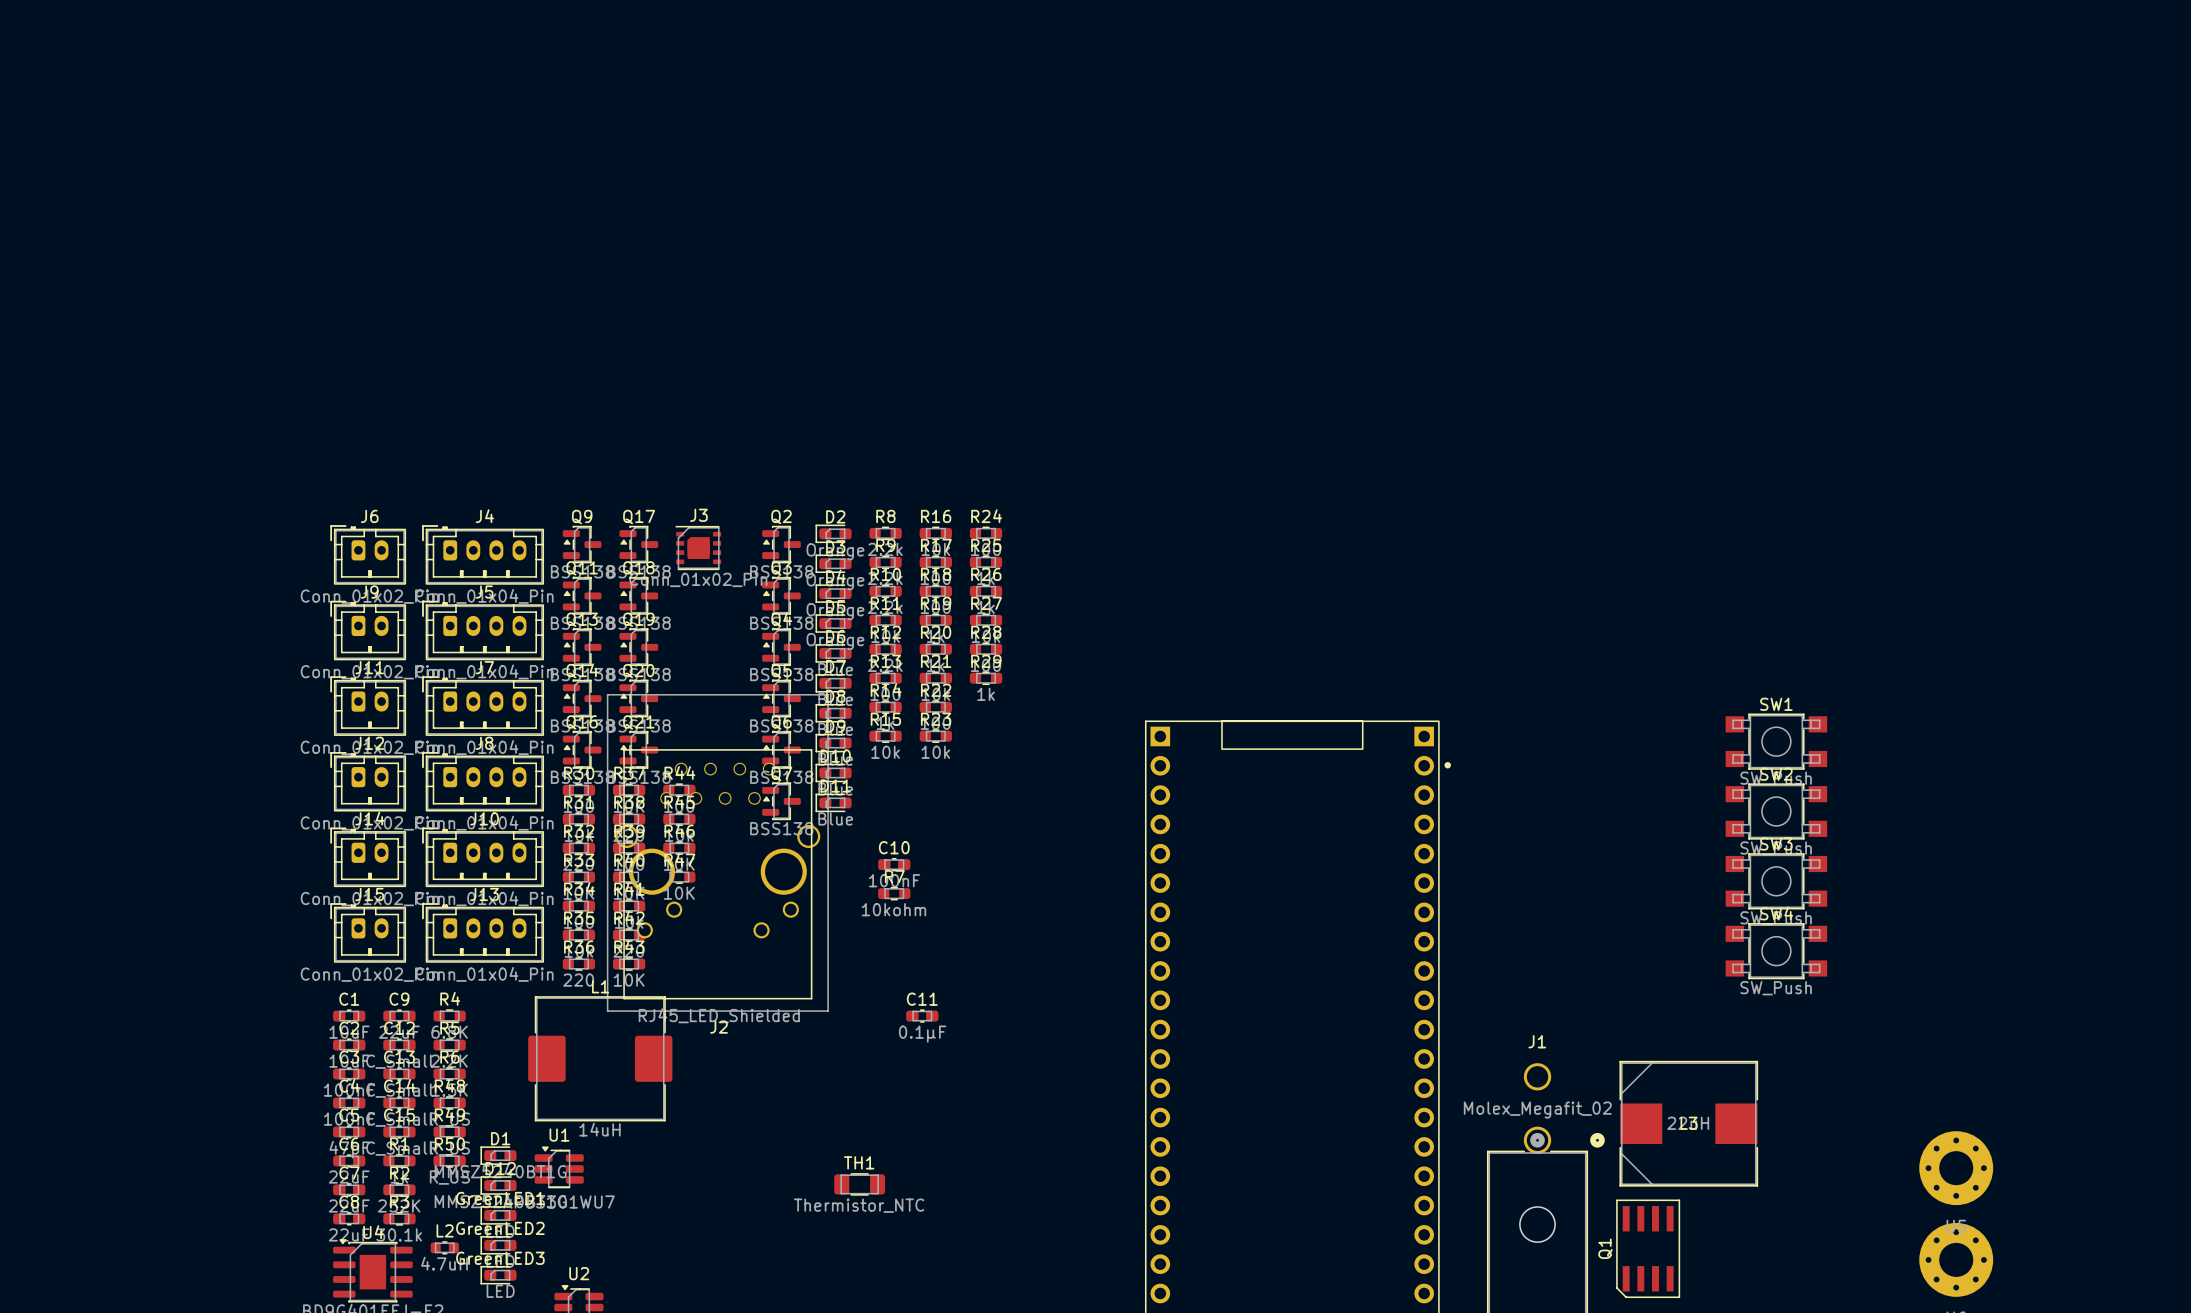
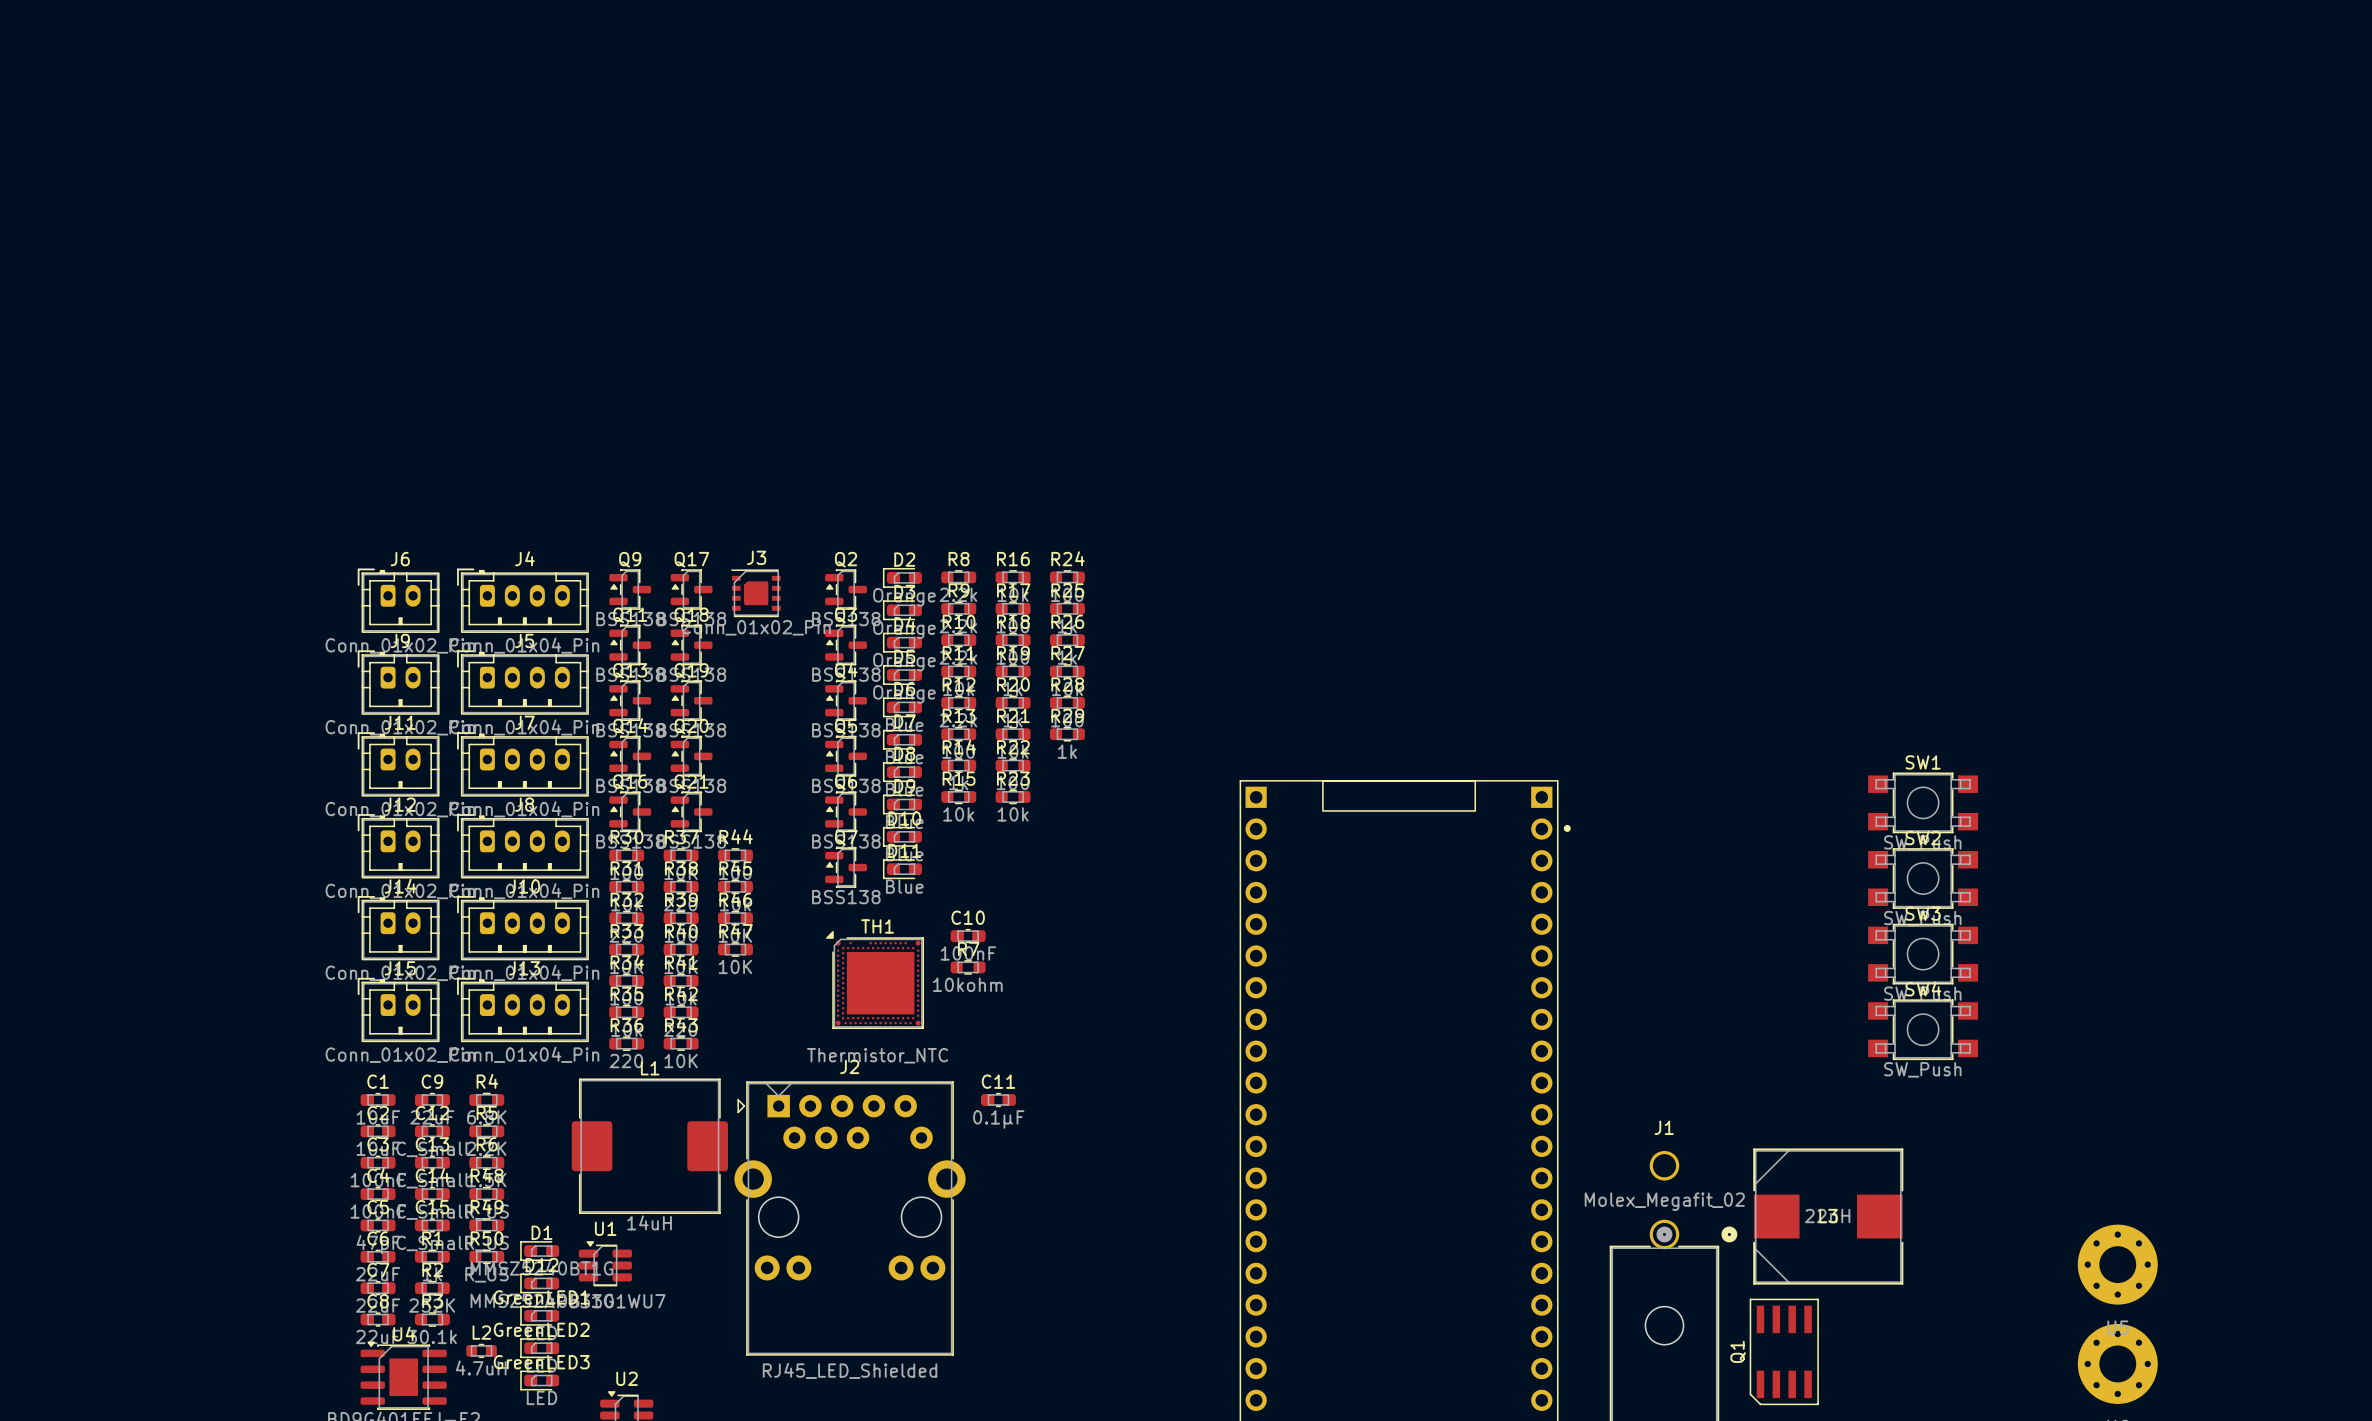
J2 footprint: [606, 694, 829, 1012] -> [734, 1081, 966, 1356]
J2 name position: J2 (719, 1027) -> J2 (849, 1066)
TH1 name position: TH1 (859, 1162) -> TH1 (877, 926)
TH1 footprint: [834, 1173, 886, 1196] -> [826, 931, 925, 1030]
TH1 value position: Thermistor_NTC (859, 1205) -> Thermistor_NTC (877, 1055)

